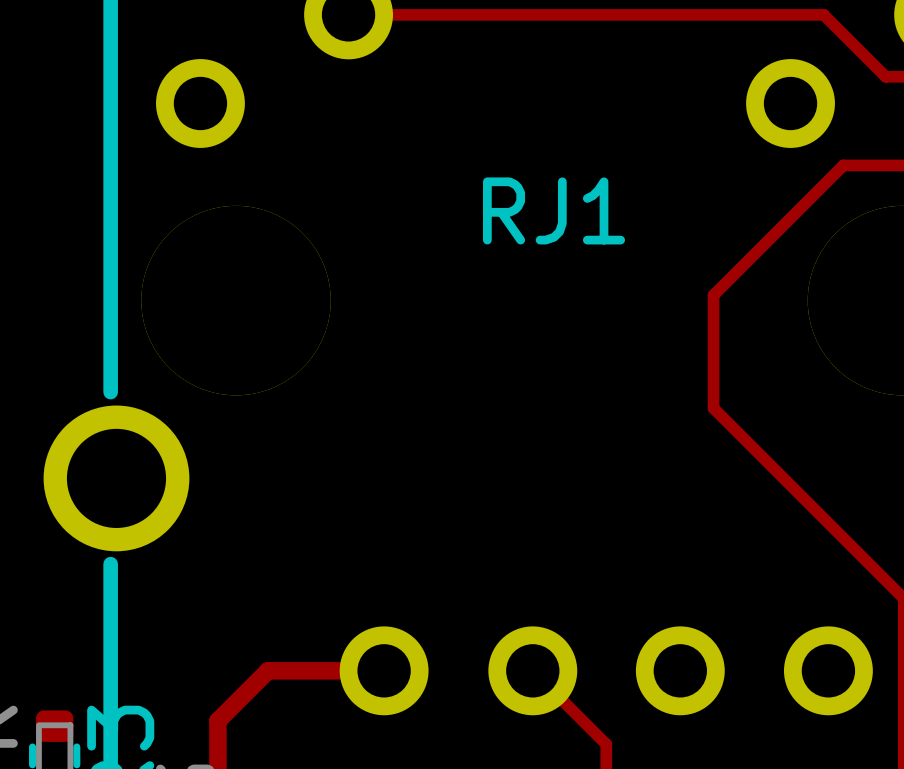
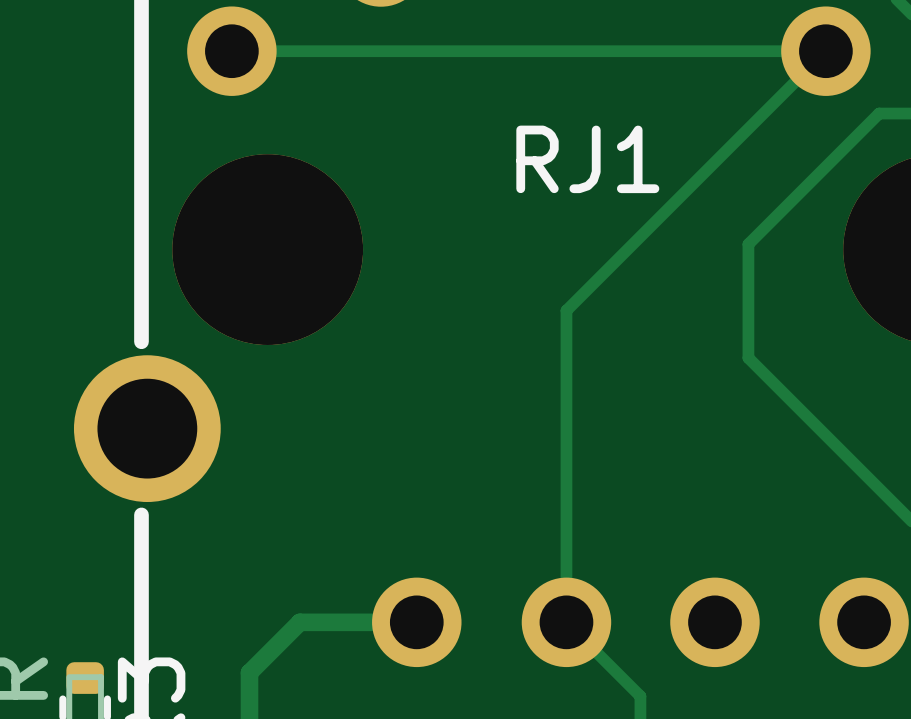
track: none -> (231, 51) (825, 51) (566, 310) (566, 622)

